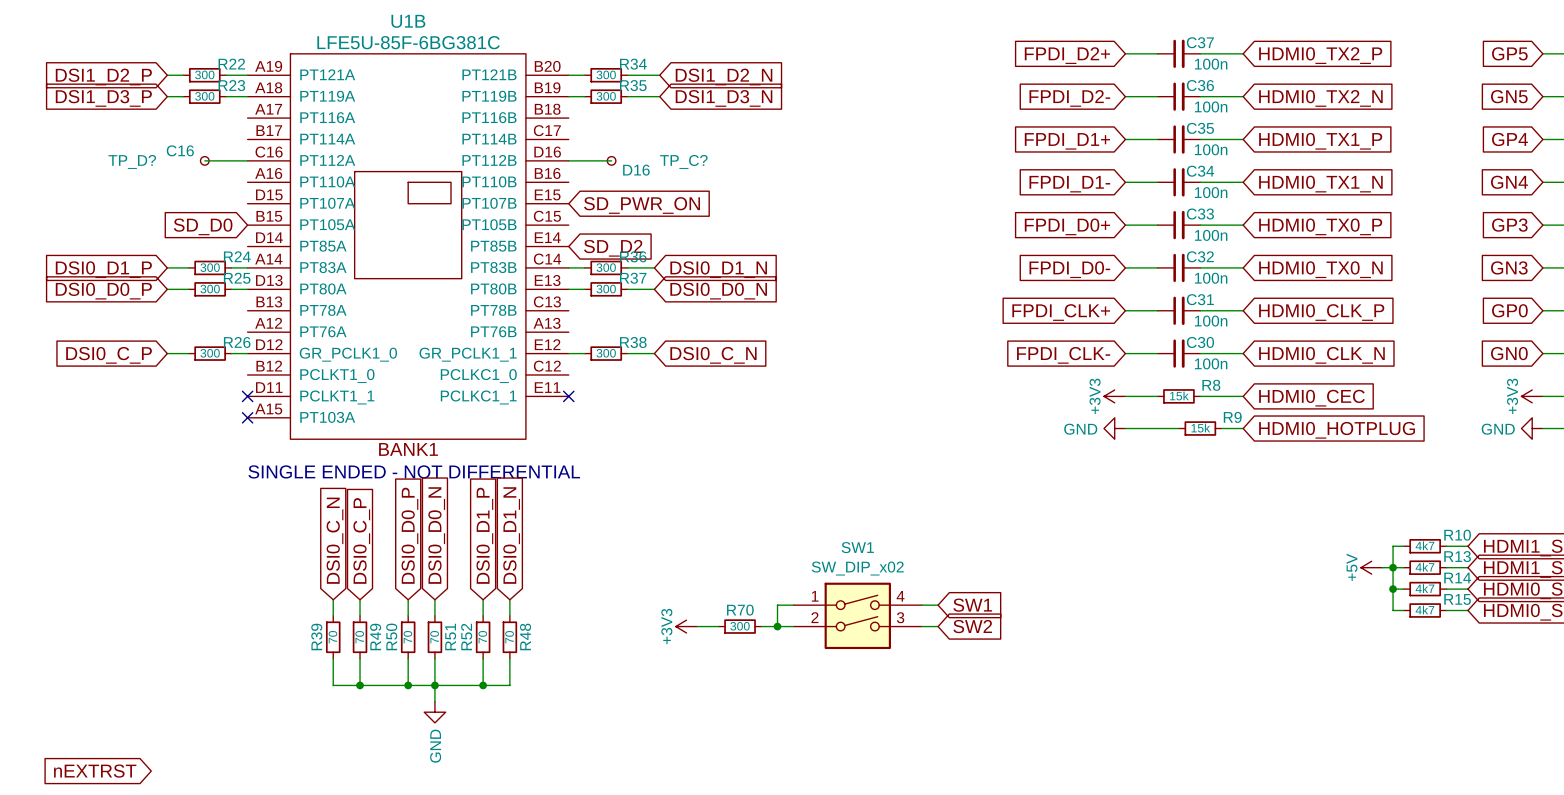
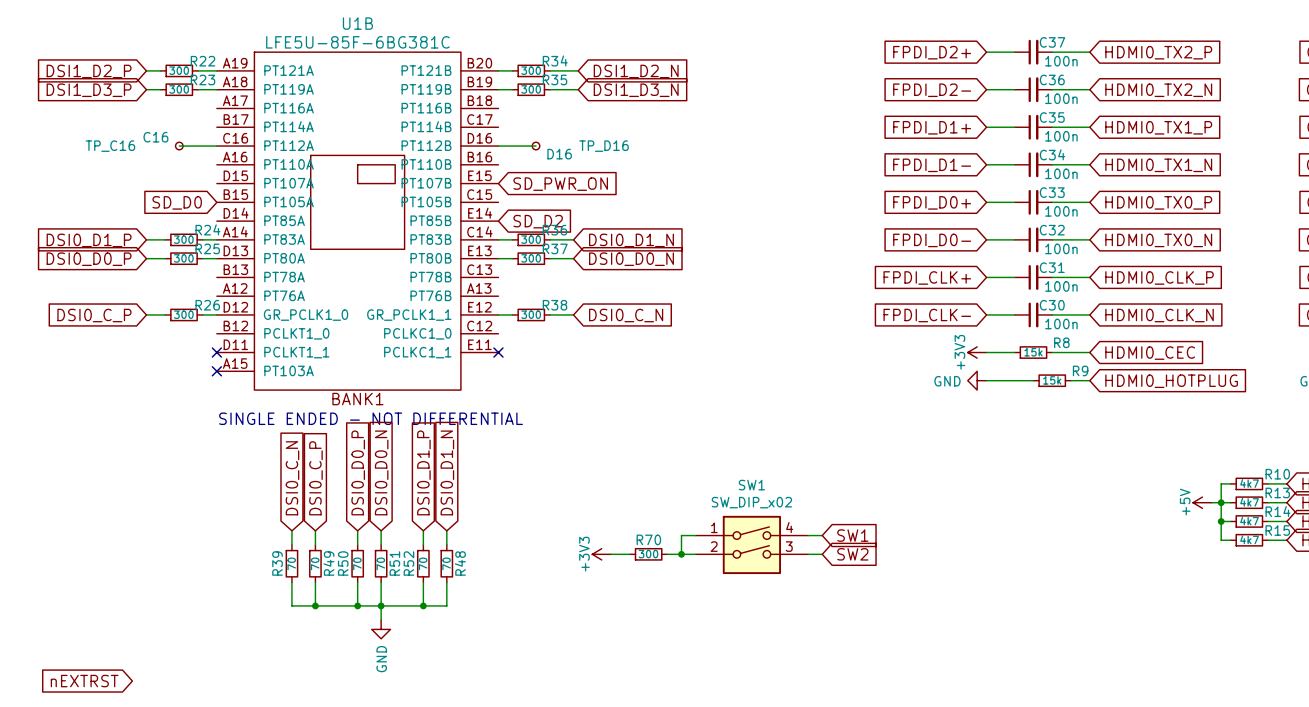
TP_D? name: TP_D? (132, 161) -> TP_C16 (110, 146)
TP_C? name: TP_C? (683, 161) -> TP_D16 (604, 146)

